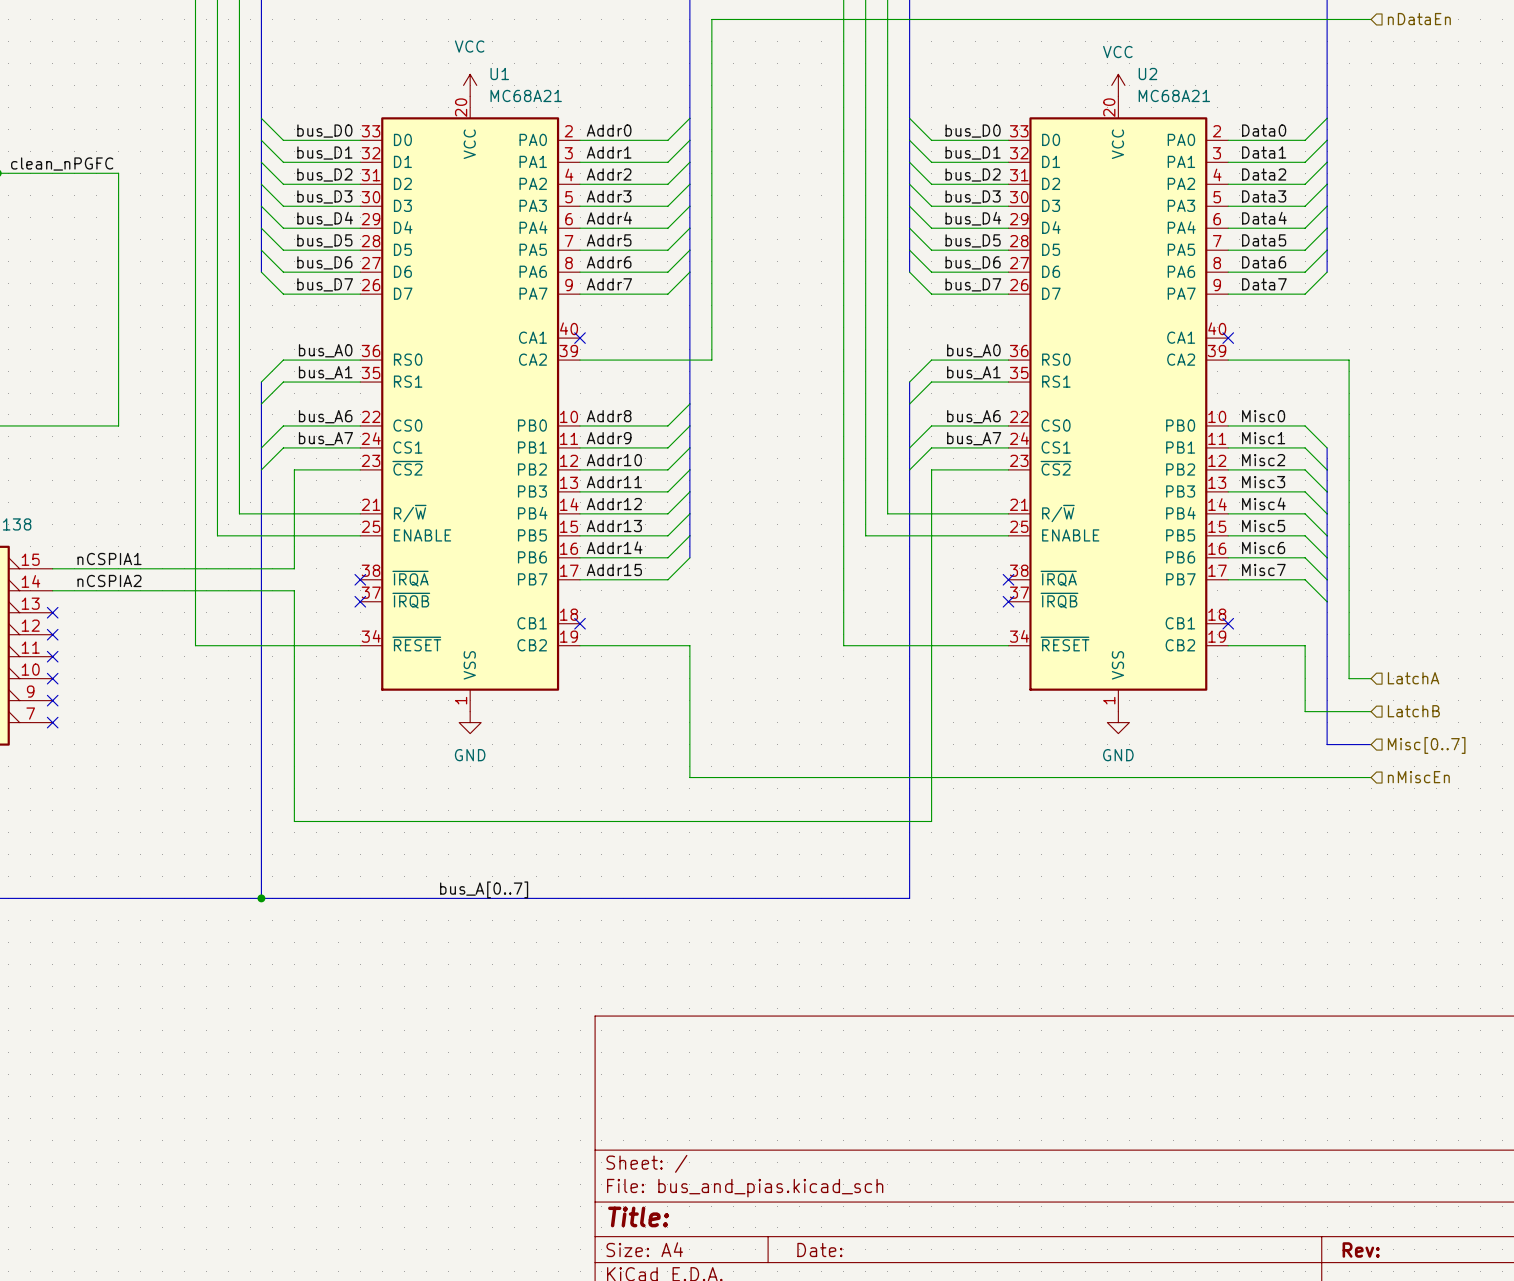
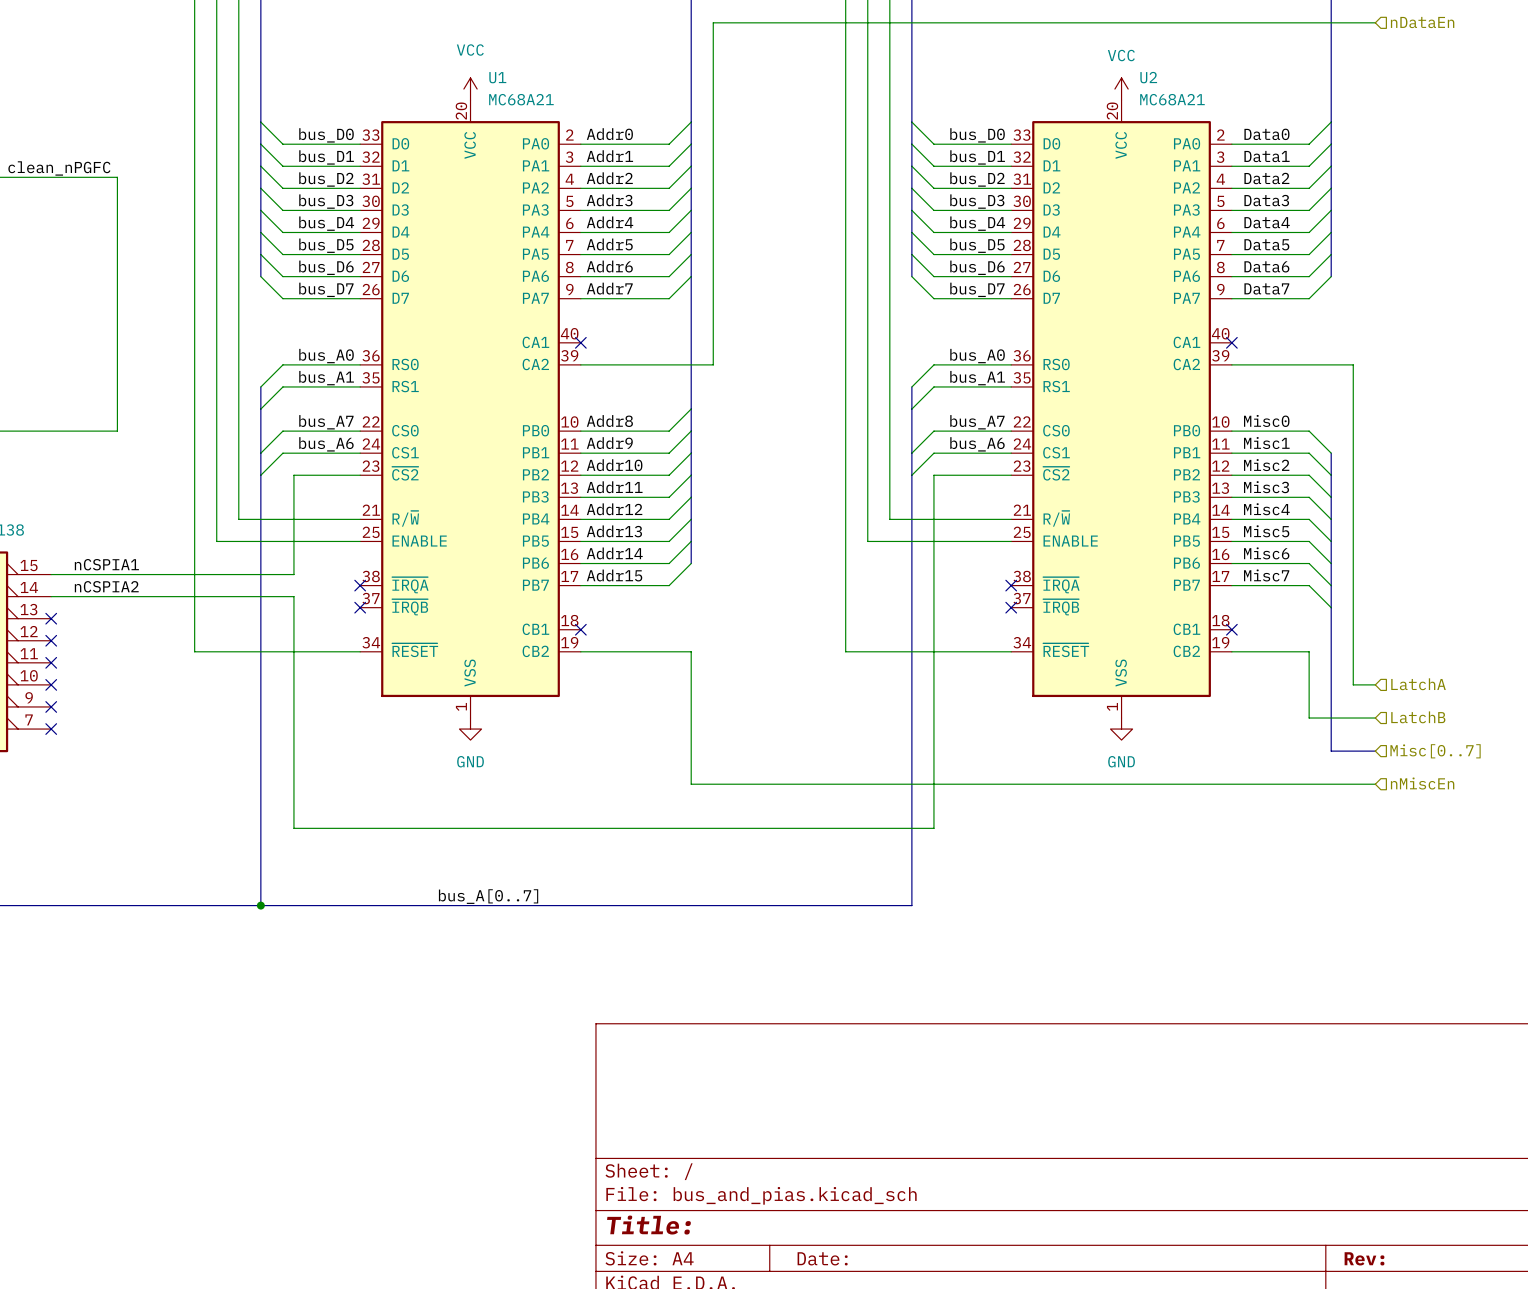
label: bus_A6 (325, 416) -> bus_A7 (326, 422)
label: bus_A6 (973, 416) -> bus_A7 (977, 422)
label: bus_A7 (325, 438) -> bus_A6 (326, 444)
label: bus_A7 (974, 438) -> bus_A6 (977, 444)

